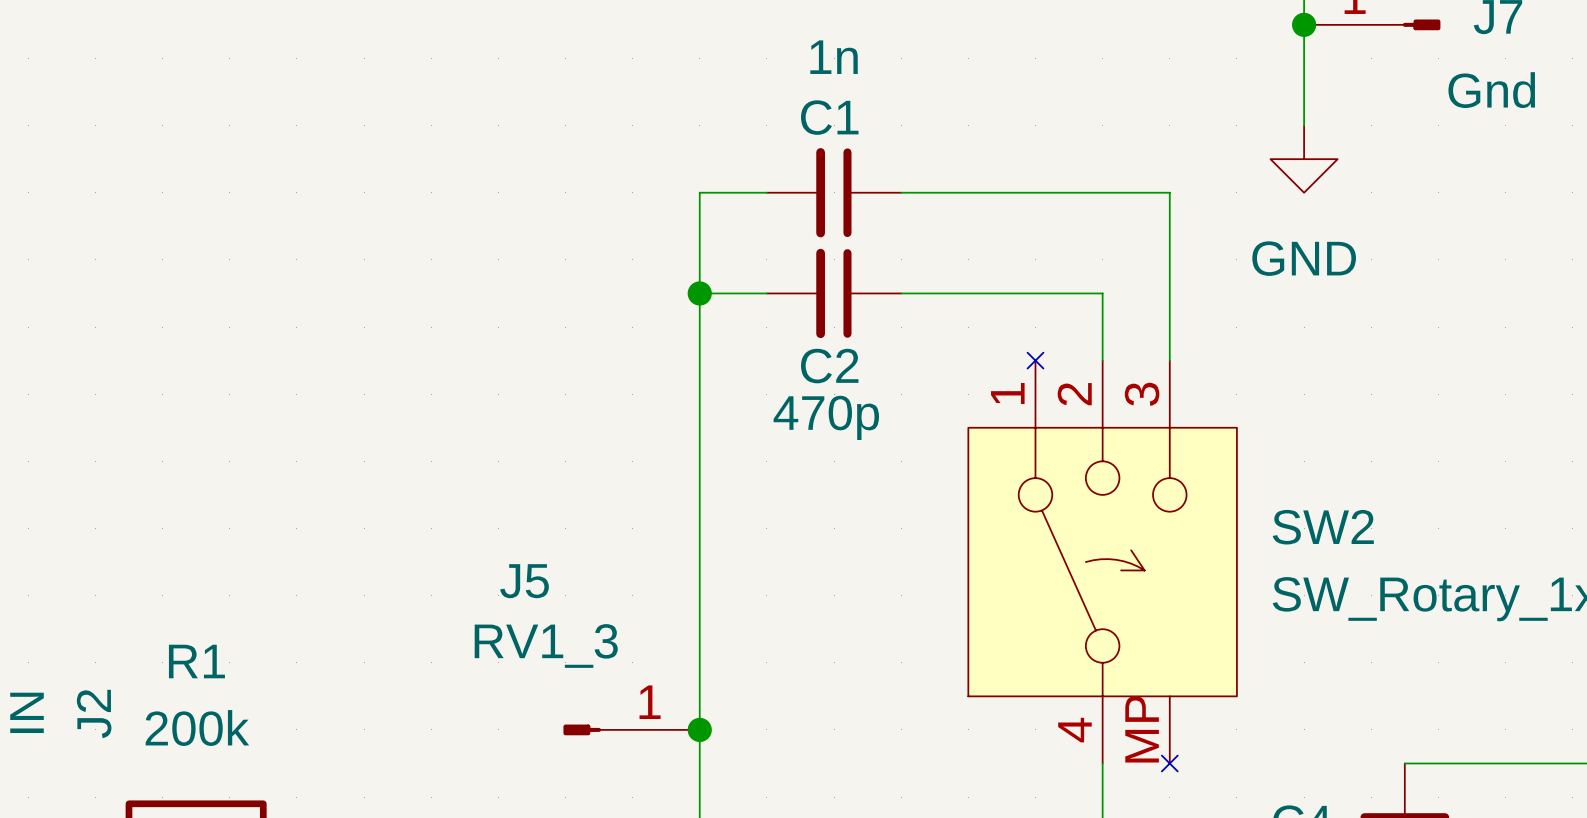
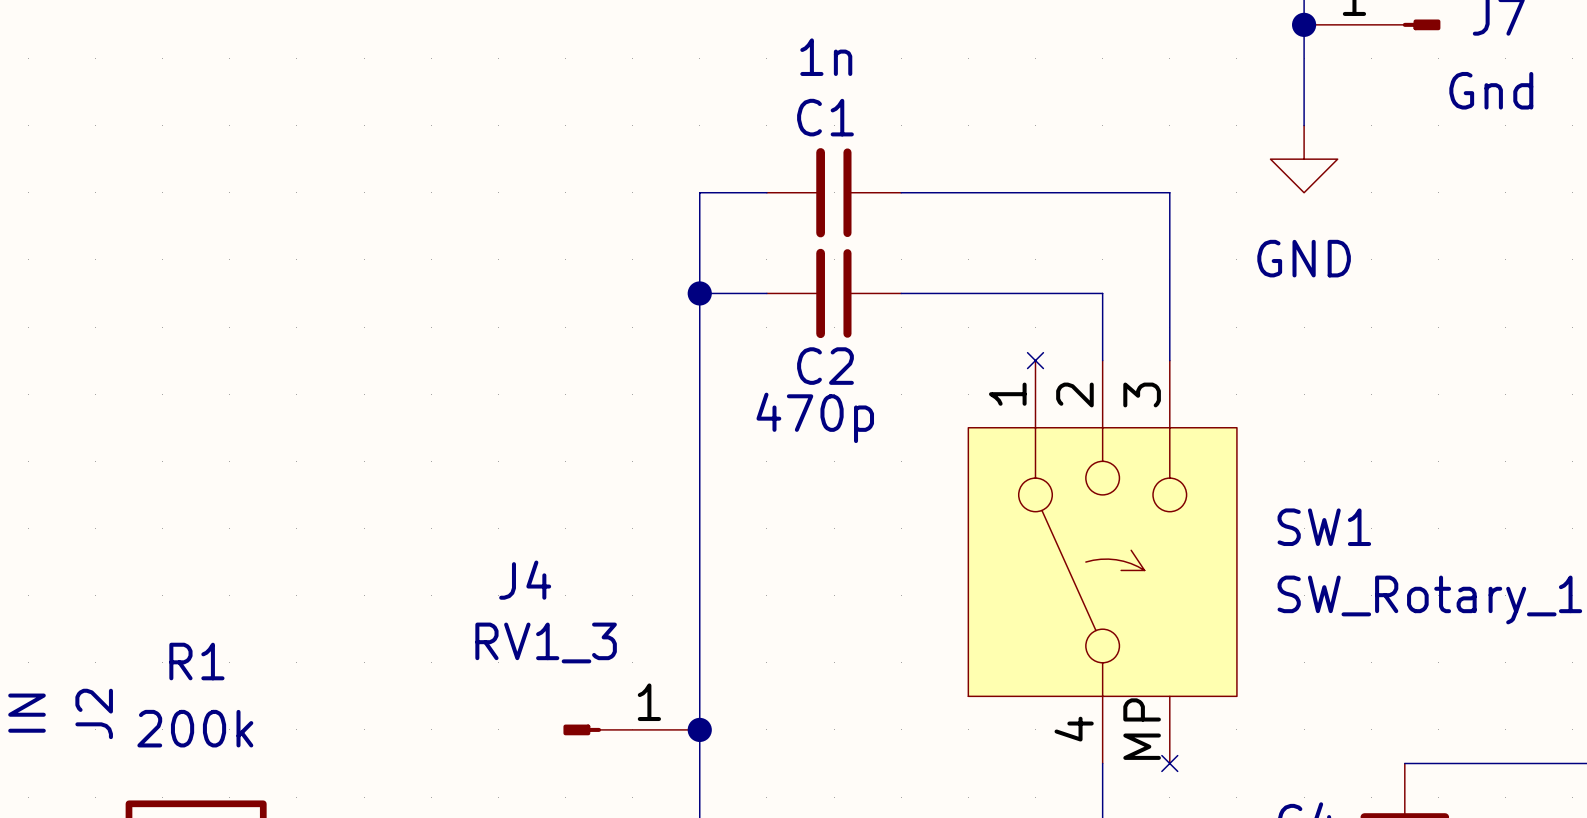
SW2 name: SW2 (1323, 527) -> SW1 (1324, 527)
J5 name: J5 (524, 581) -> J4 (525, 580)

